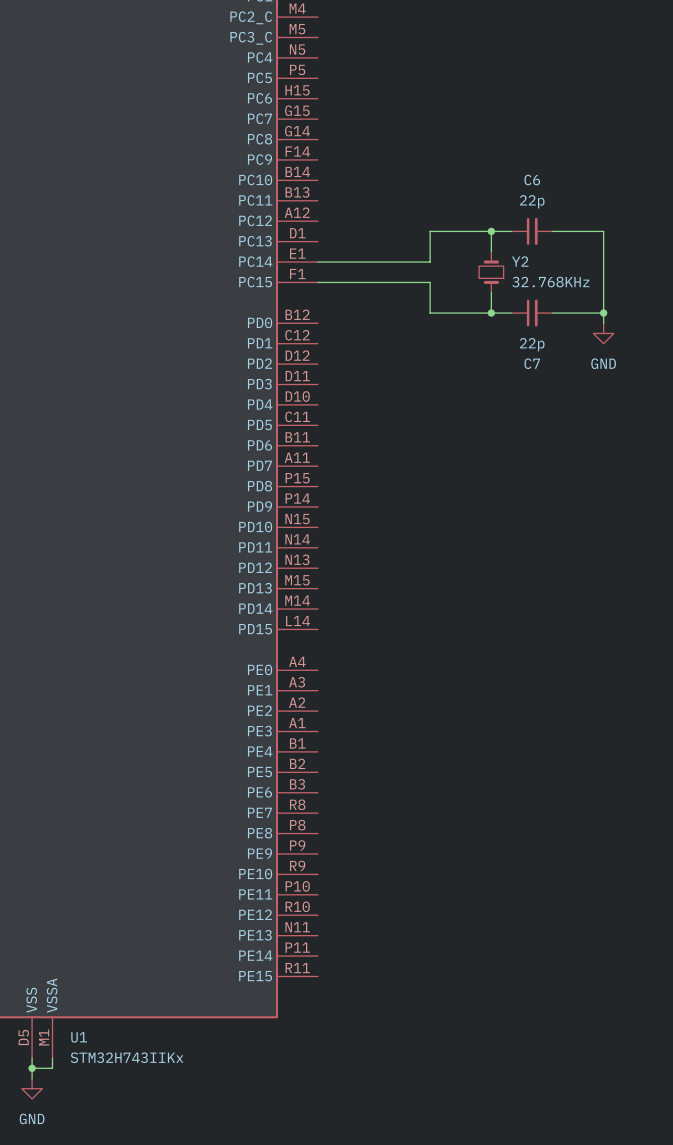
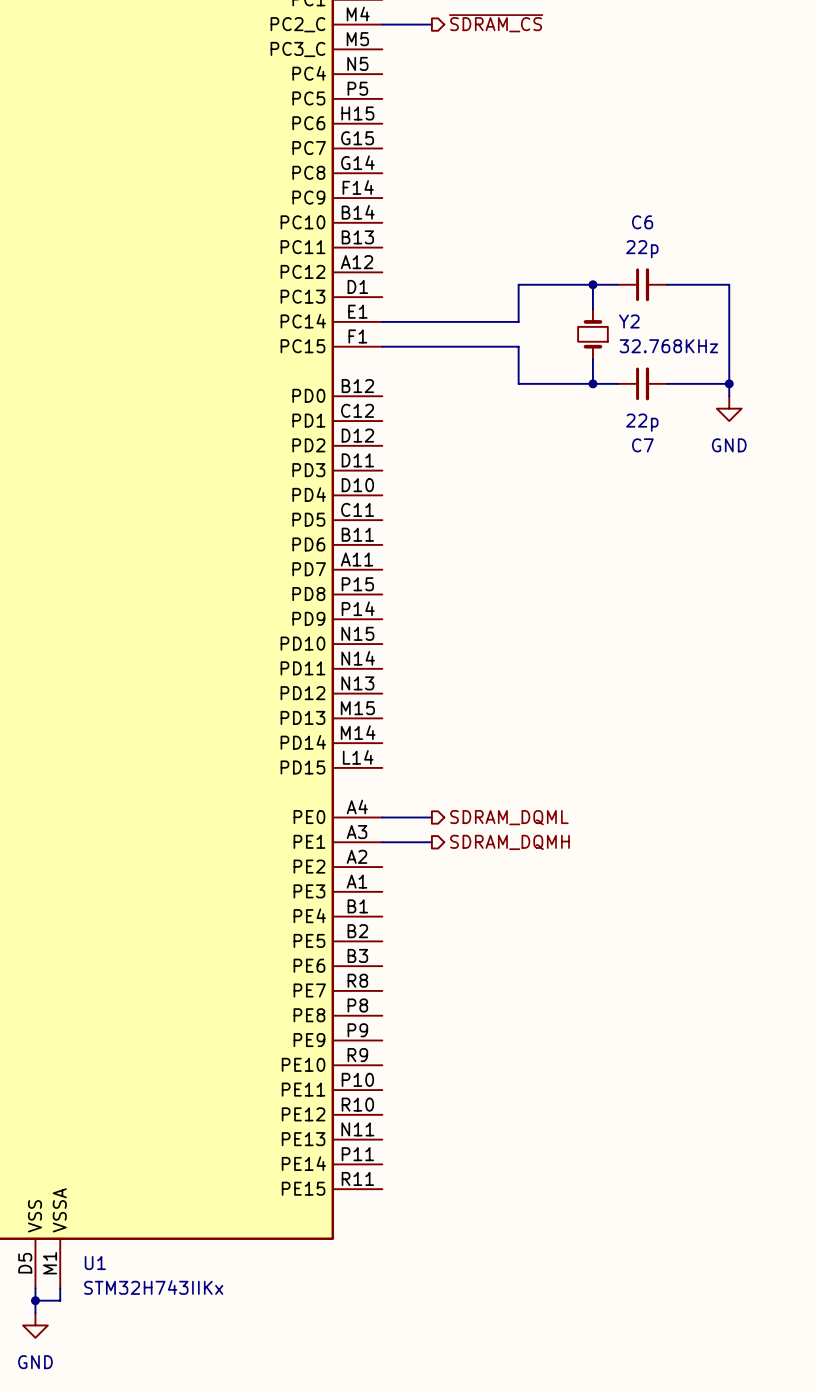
hierarchical label: none -> ~{SDRAM_CS} (496, 23)
wire: none -> (382, 24) (431, 24)
wire: none -> (382, 817) (431, 817)
hierarchical label: none -> SDRAM_DQML (509, 817)
wire: none -> (382, 842) (431, 842)
hierarchical label: none -> SDRAM_DQMH (509, 842)

